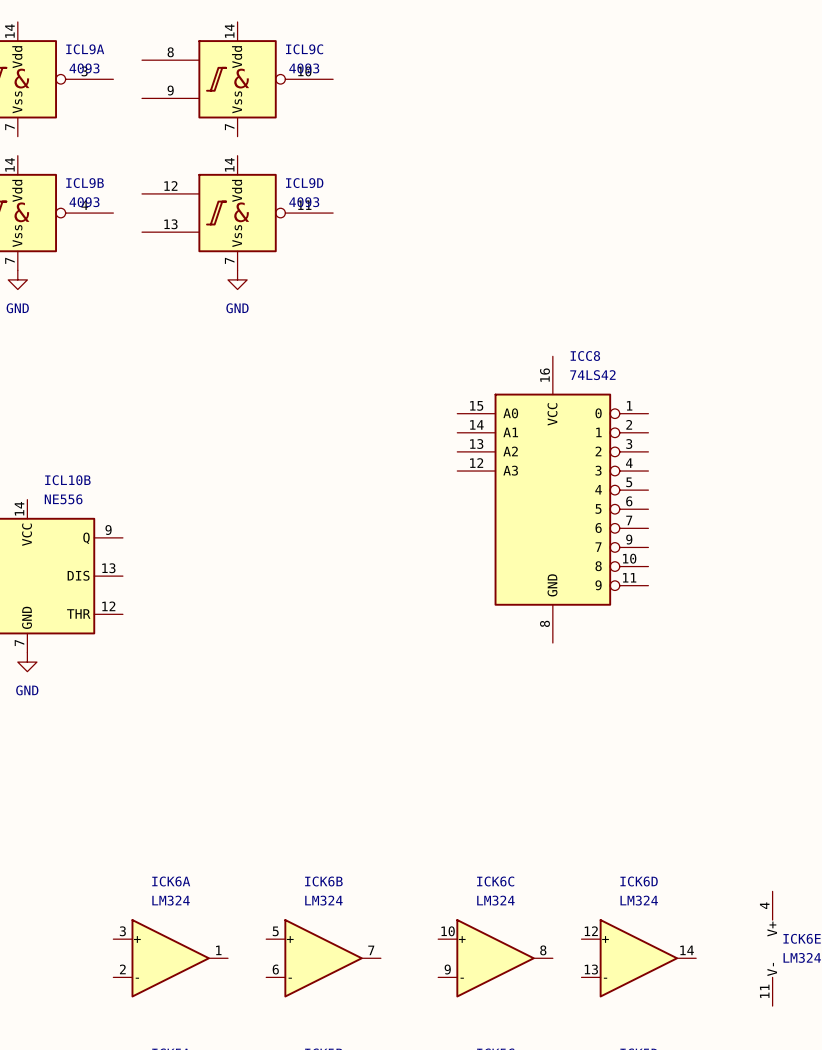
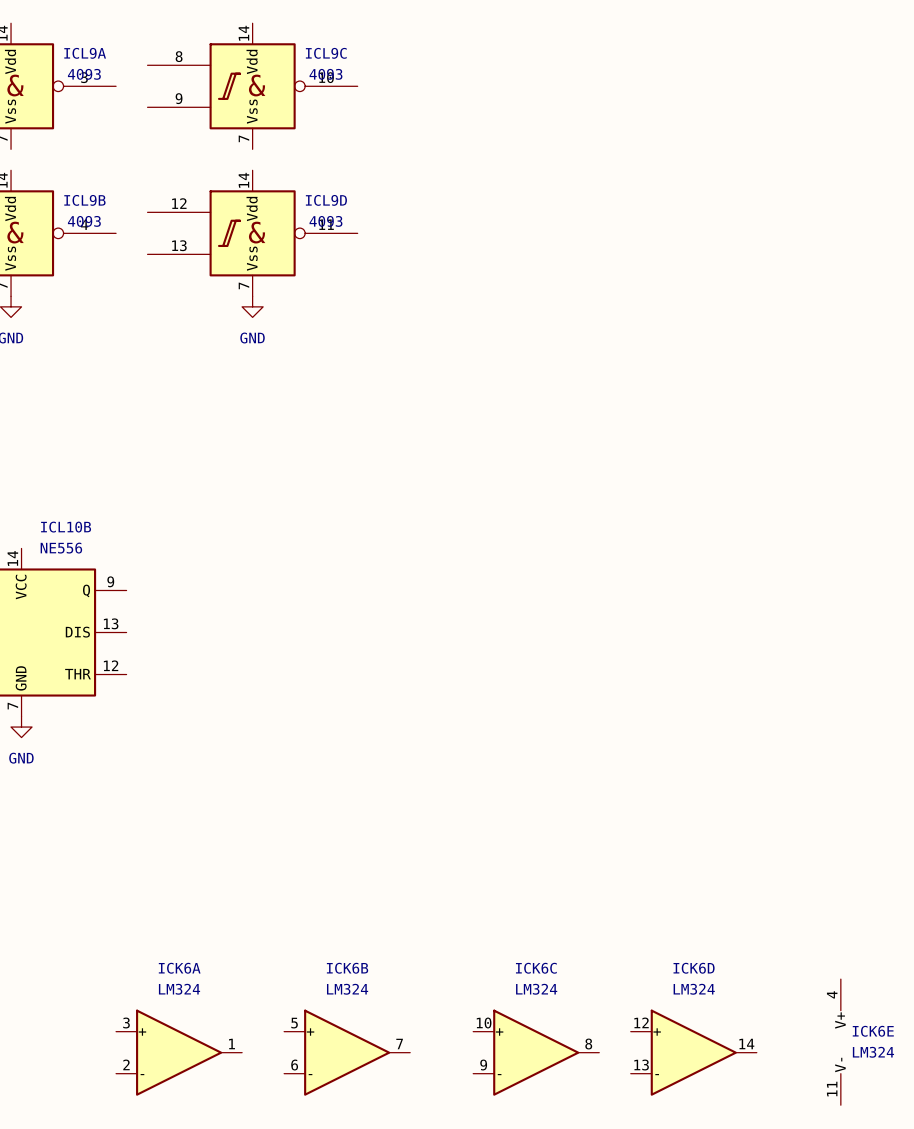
ICC8: 74LS42 (552, 499) -> none

